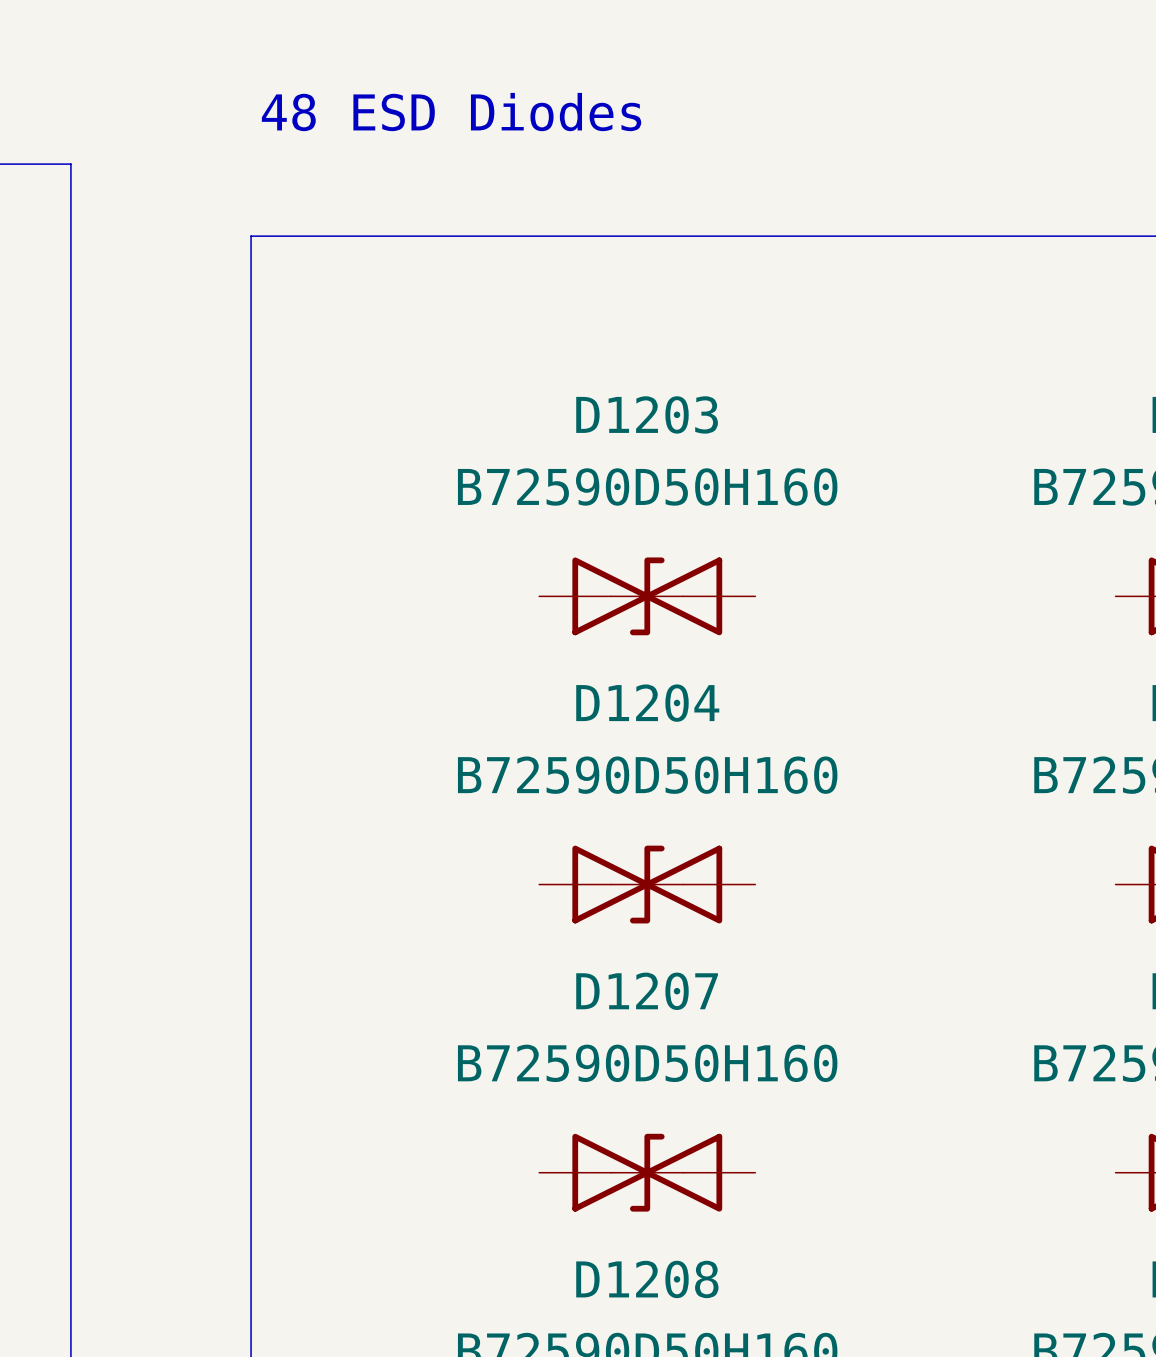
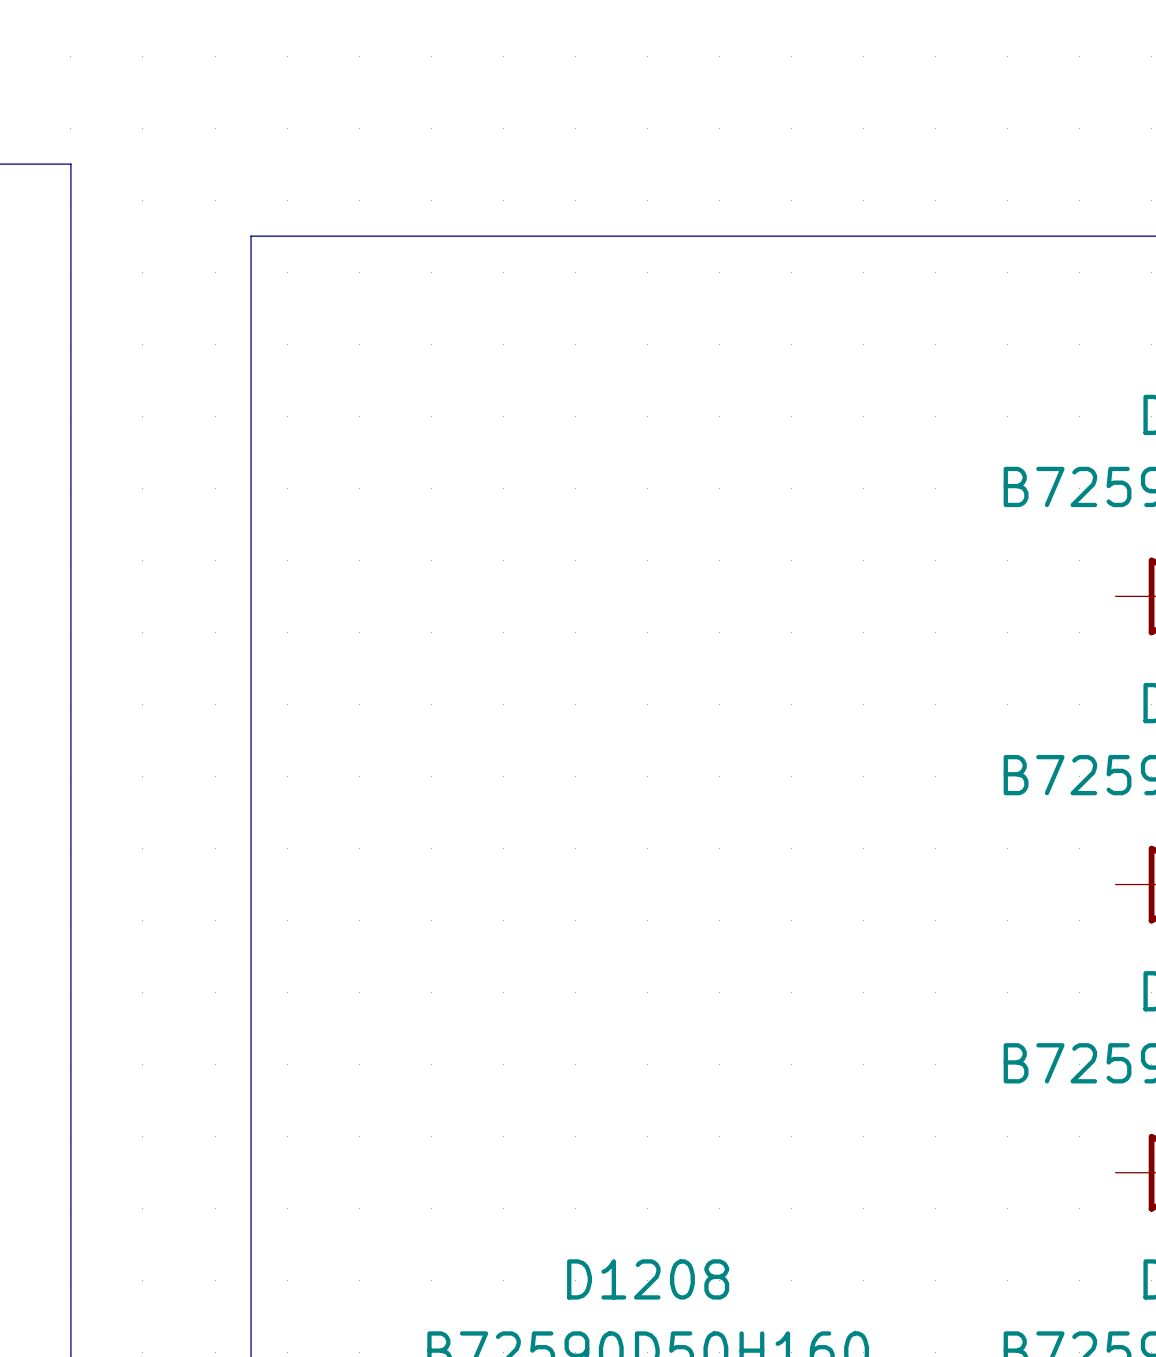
text: 48 ESD Diodes (451, 112) -> none
D1203: B72590D50H160 (647, 596) -> none
D1204: B72590D50H160 (647, 884) -> none
D1207: B72590D50H160 (647, 1172) -> none

